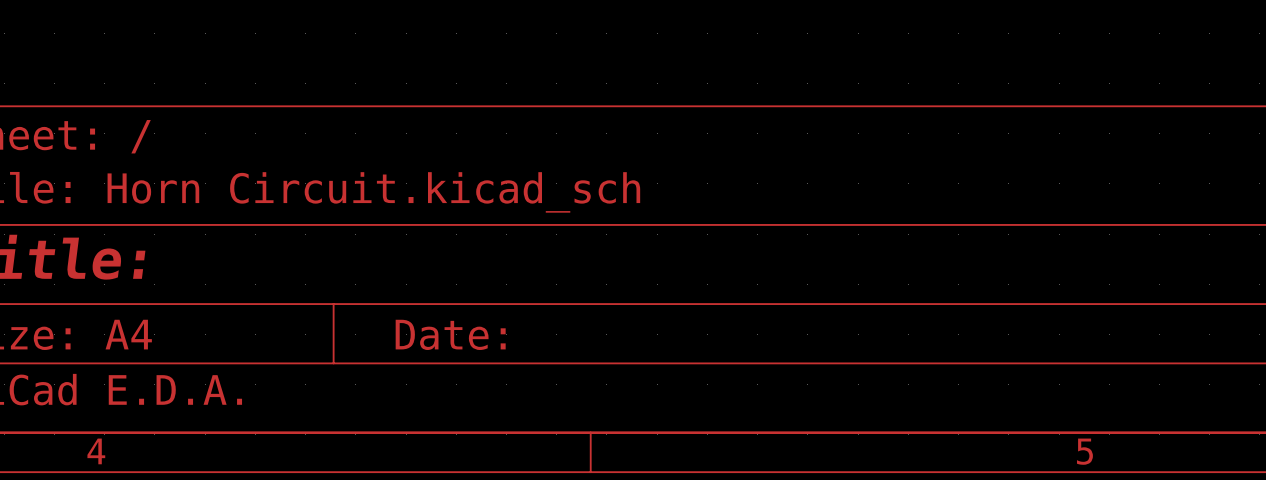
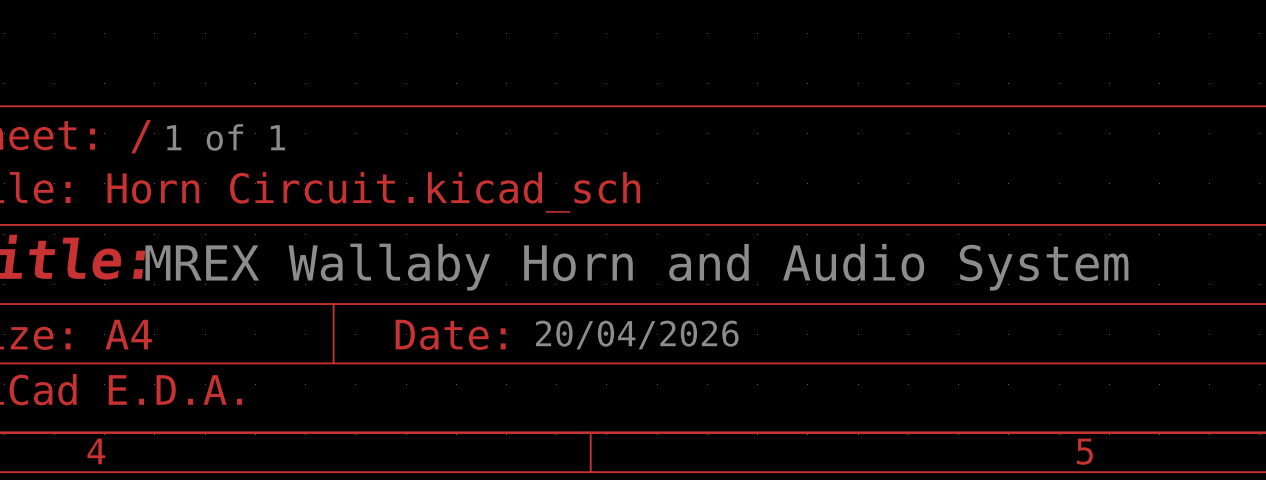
text: none -> 1 of 1 (226, 137)
text: none -> MREX Wallaby Horn and Audio System (636, 267)
text: none -> 20/04/2026 (637, 335)

